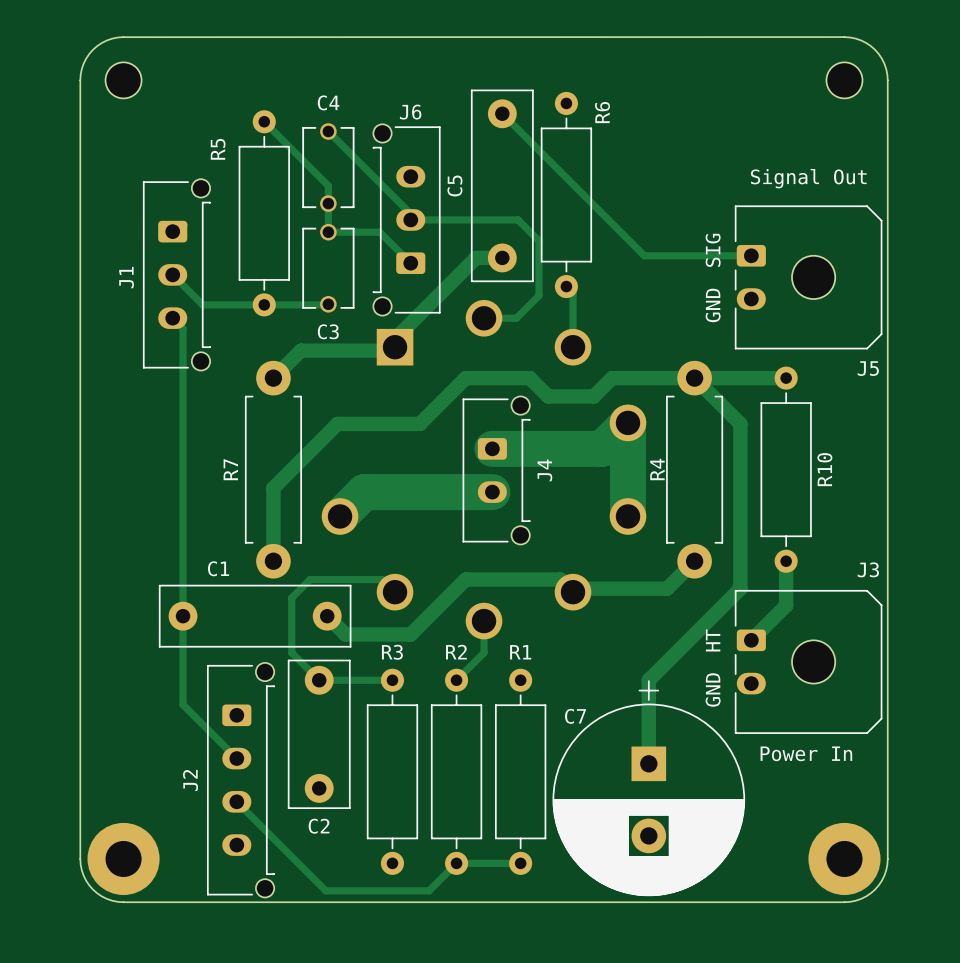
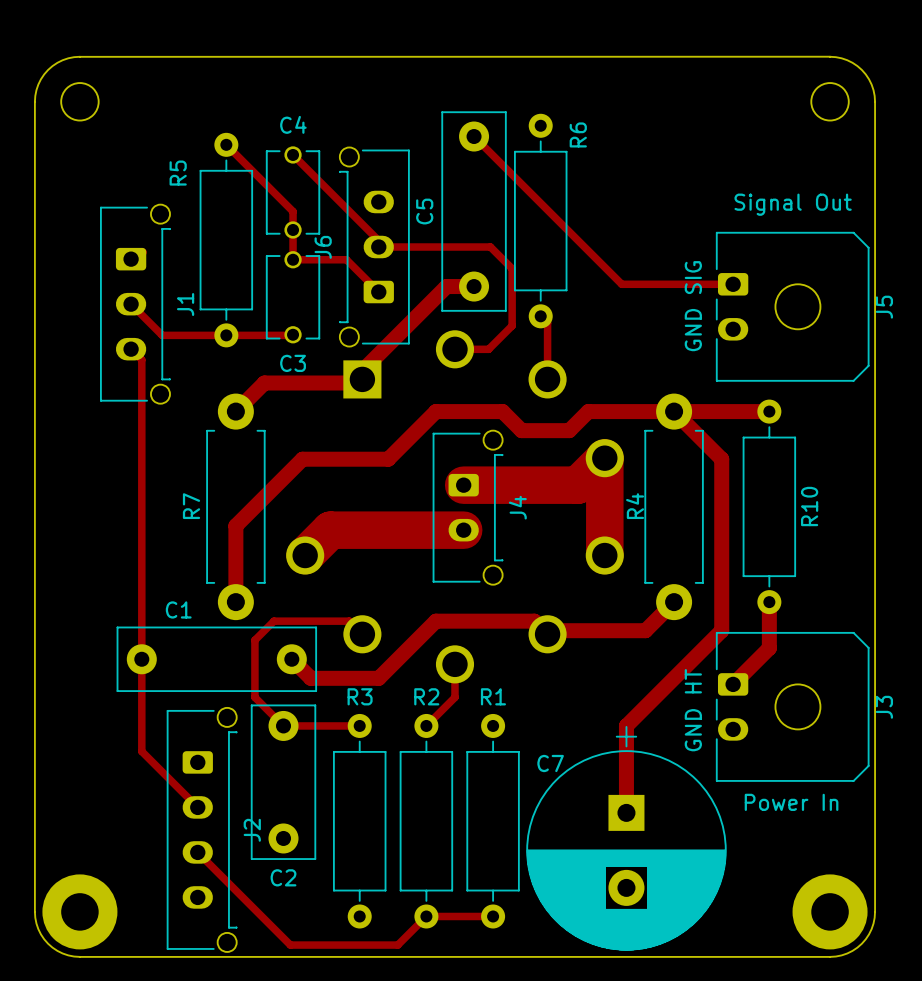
J6 name rotation: 0° (410, 112) -> 90° counterclockwise (323, 247)
J6 name position: J6 (410, 112) -> J6 (323, 247)
J1 name position: J1 (126, 277) -> J1 (185, 304)
J5 name rotation: 0° (868, 368) -> 90° counterclockwise (884, 307)
J5 name position: J5 (868, 368) -> J5 (884, 307)
J3 name rotation: 0° (868, 569) -> 90° counterclockwise (884, 707)
J3 name position: J3 (868, 569) -> J3 (884, 707)
J2 name position: J2 (190, 780) -> J2 (252, 830)

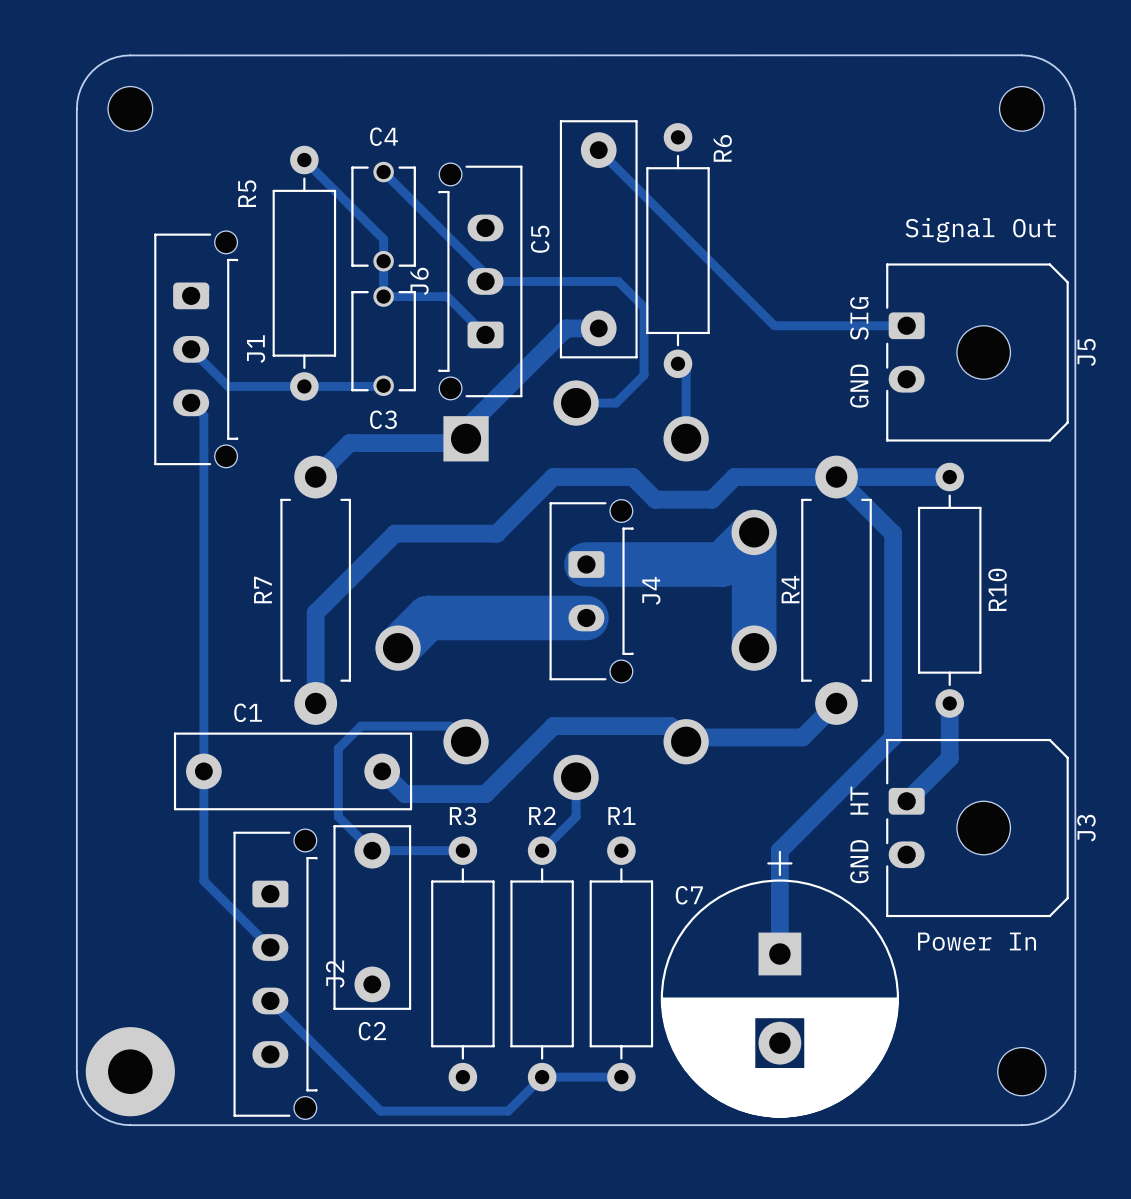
part footprint: [792, 874, 868, 950] -> [997, 1047, 1046, 1096]

